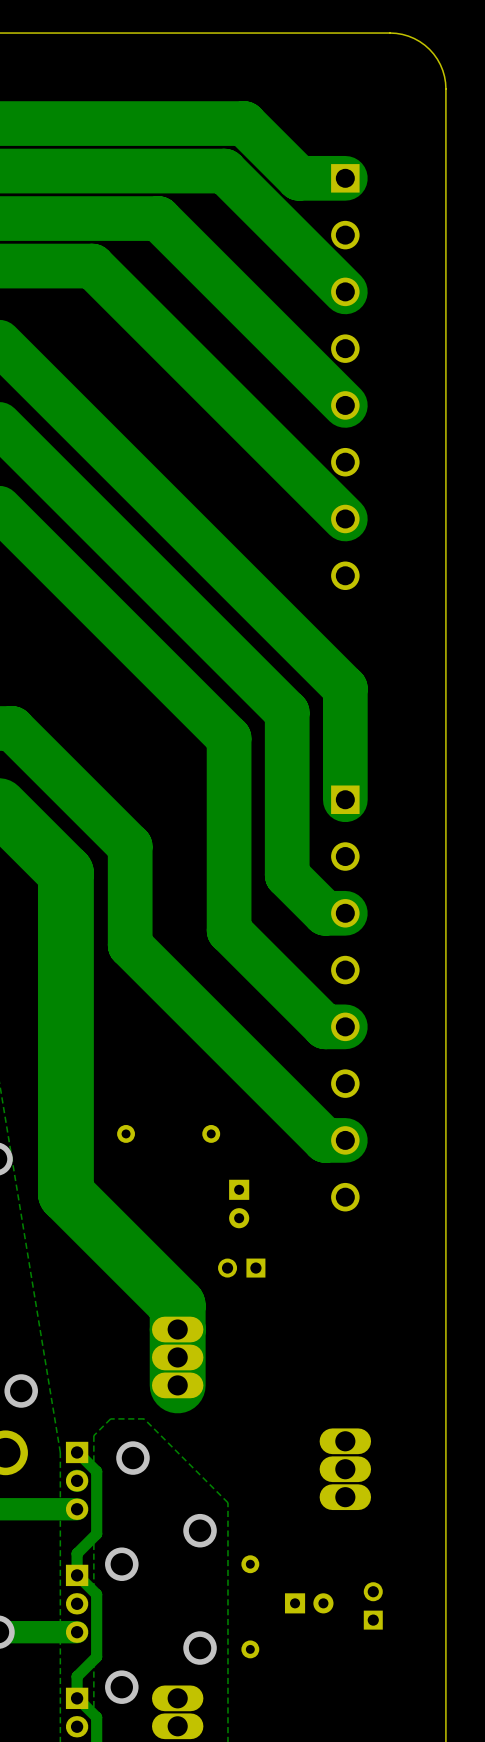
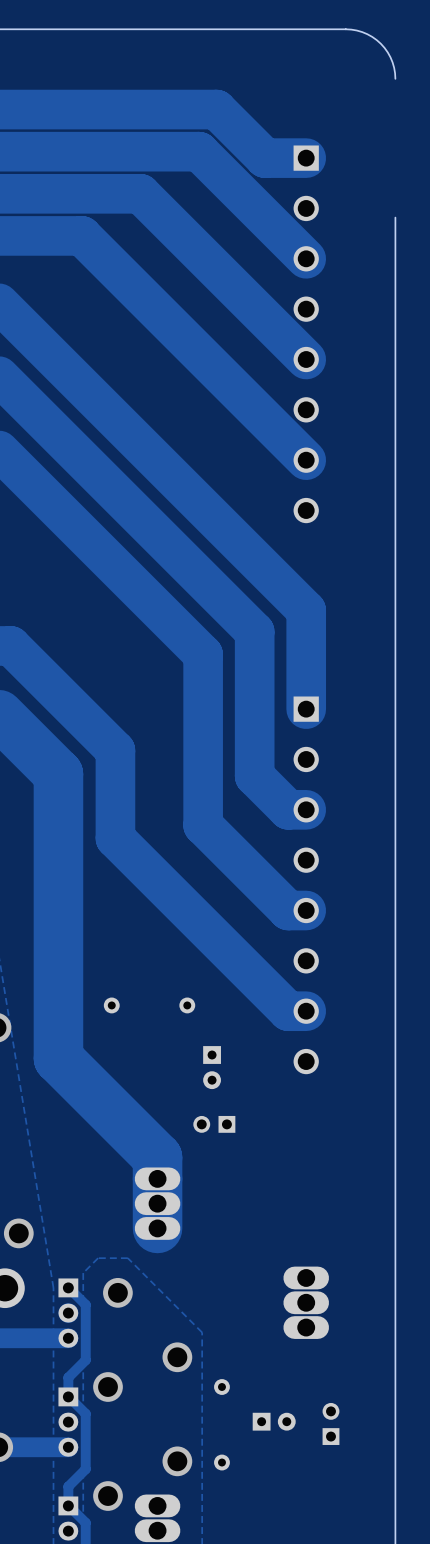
board edge: (445, 88) (445, 245) -> none

